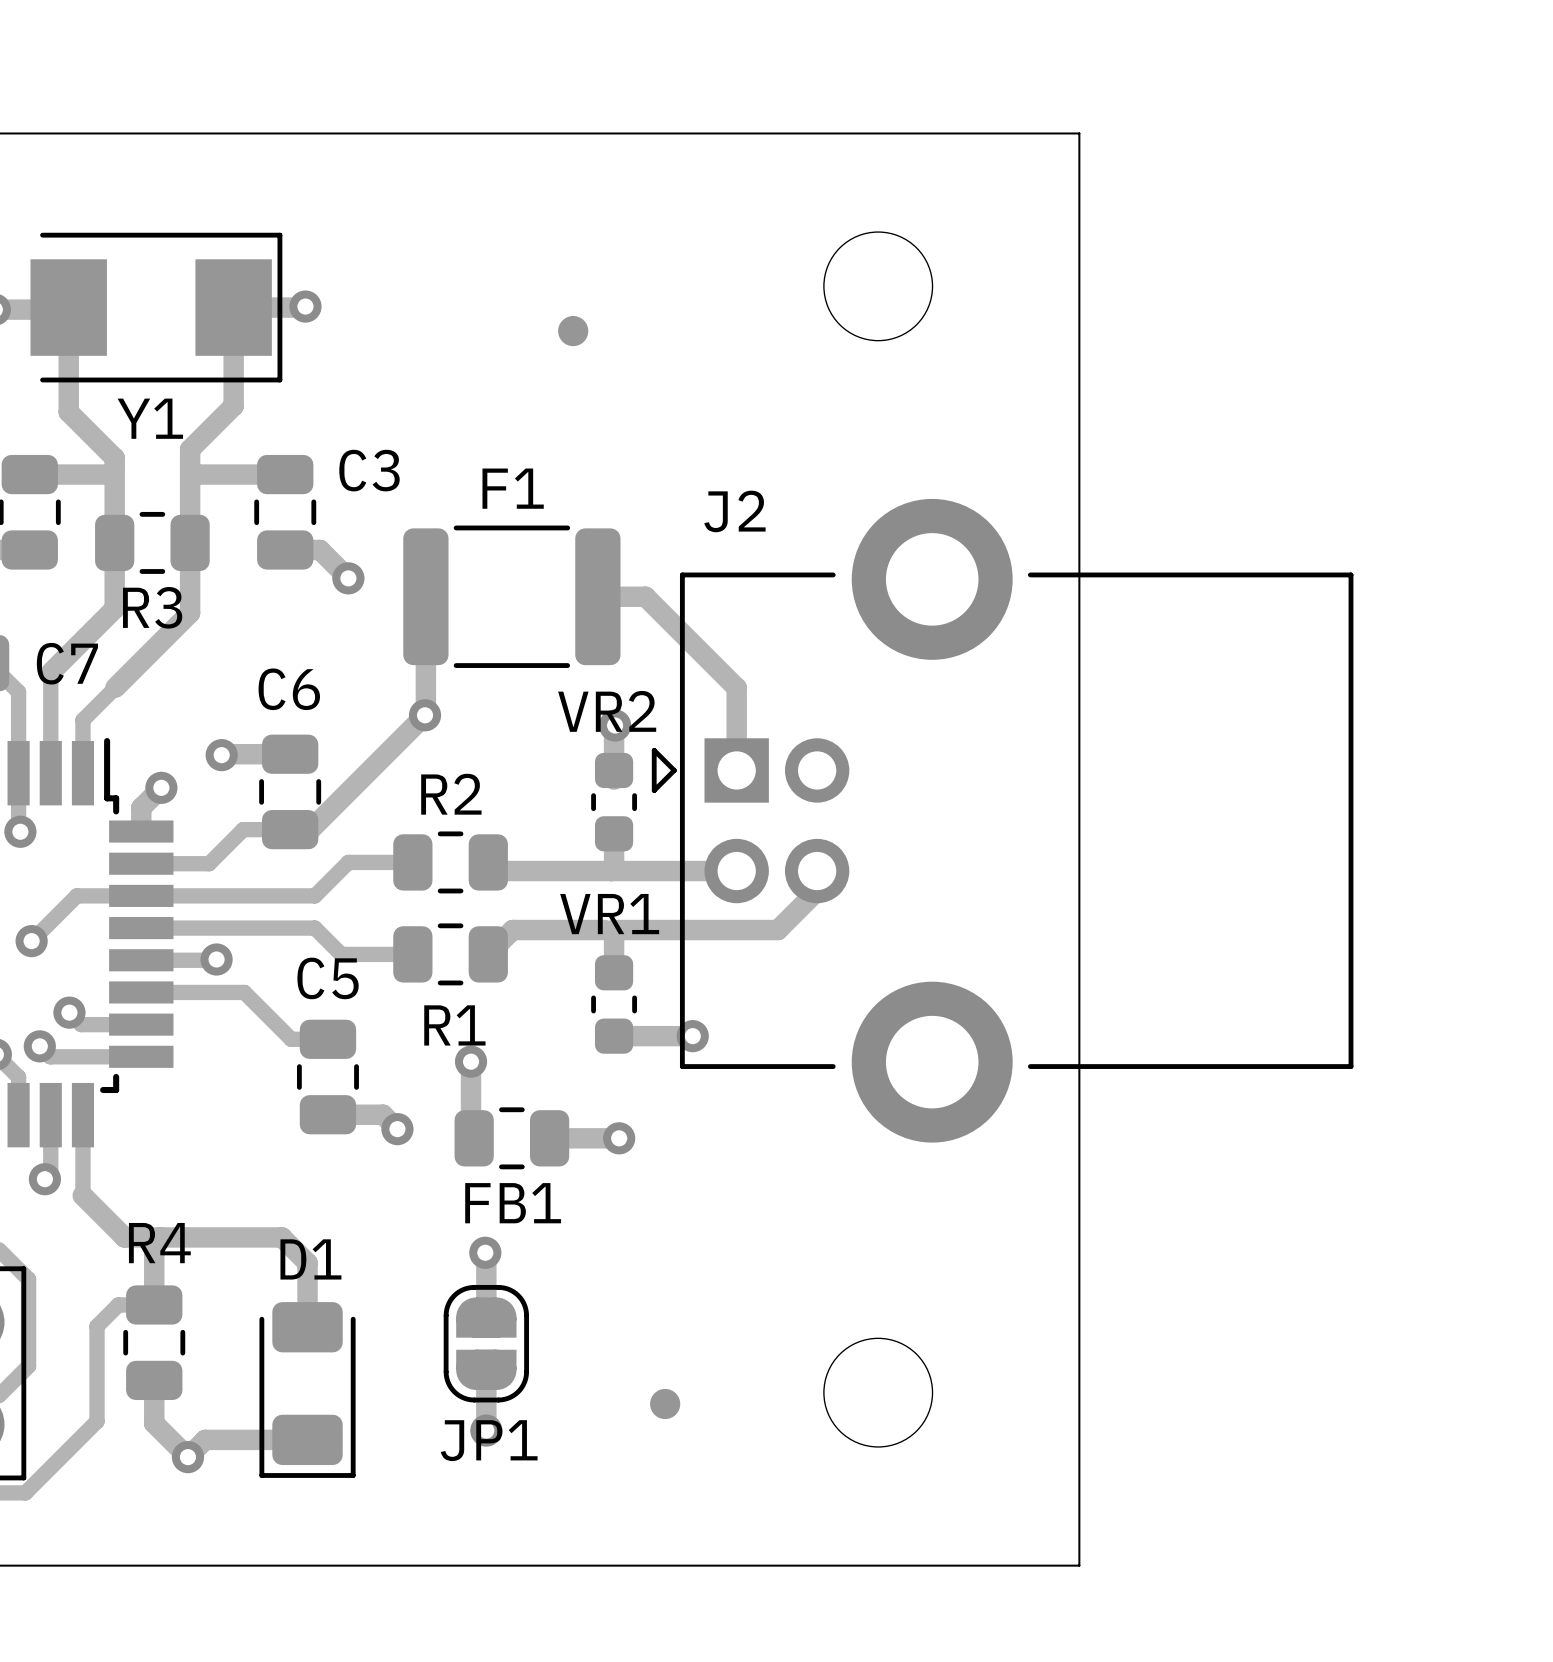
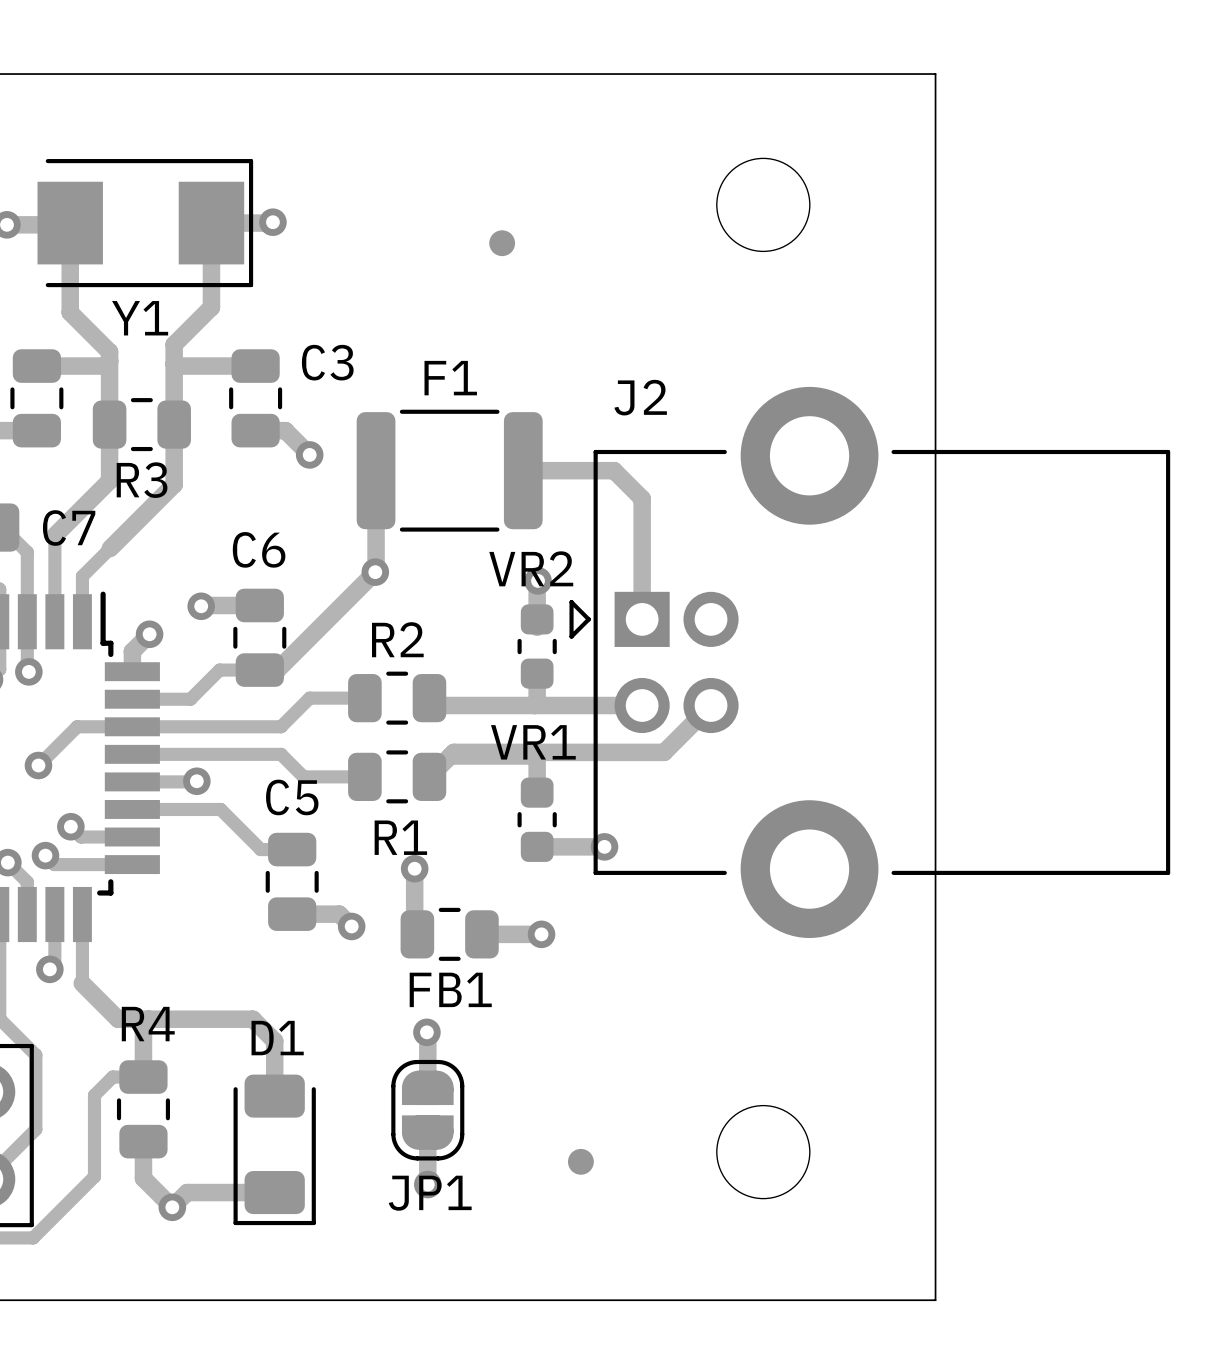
track: (645, 596) (736, 687) -> (564, 470) (614, 470) (642, 498) (642, 548)
track: (817, 871) (817, 890) (777, 930) (613, 930) -> (711, 705) (664, 752) (453, 752) (450, 756)

